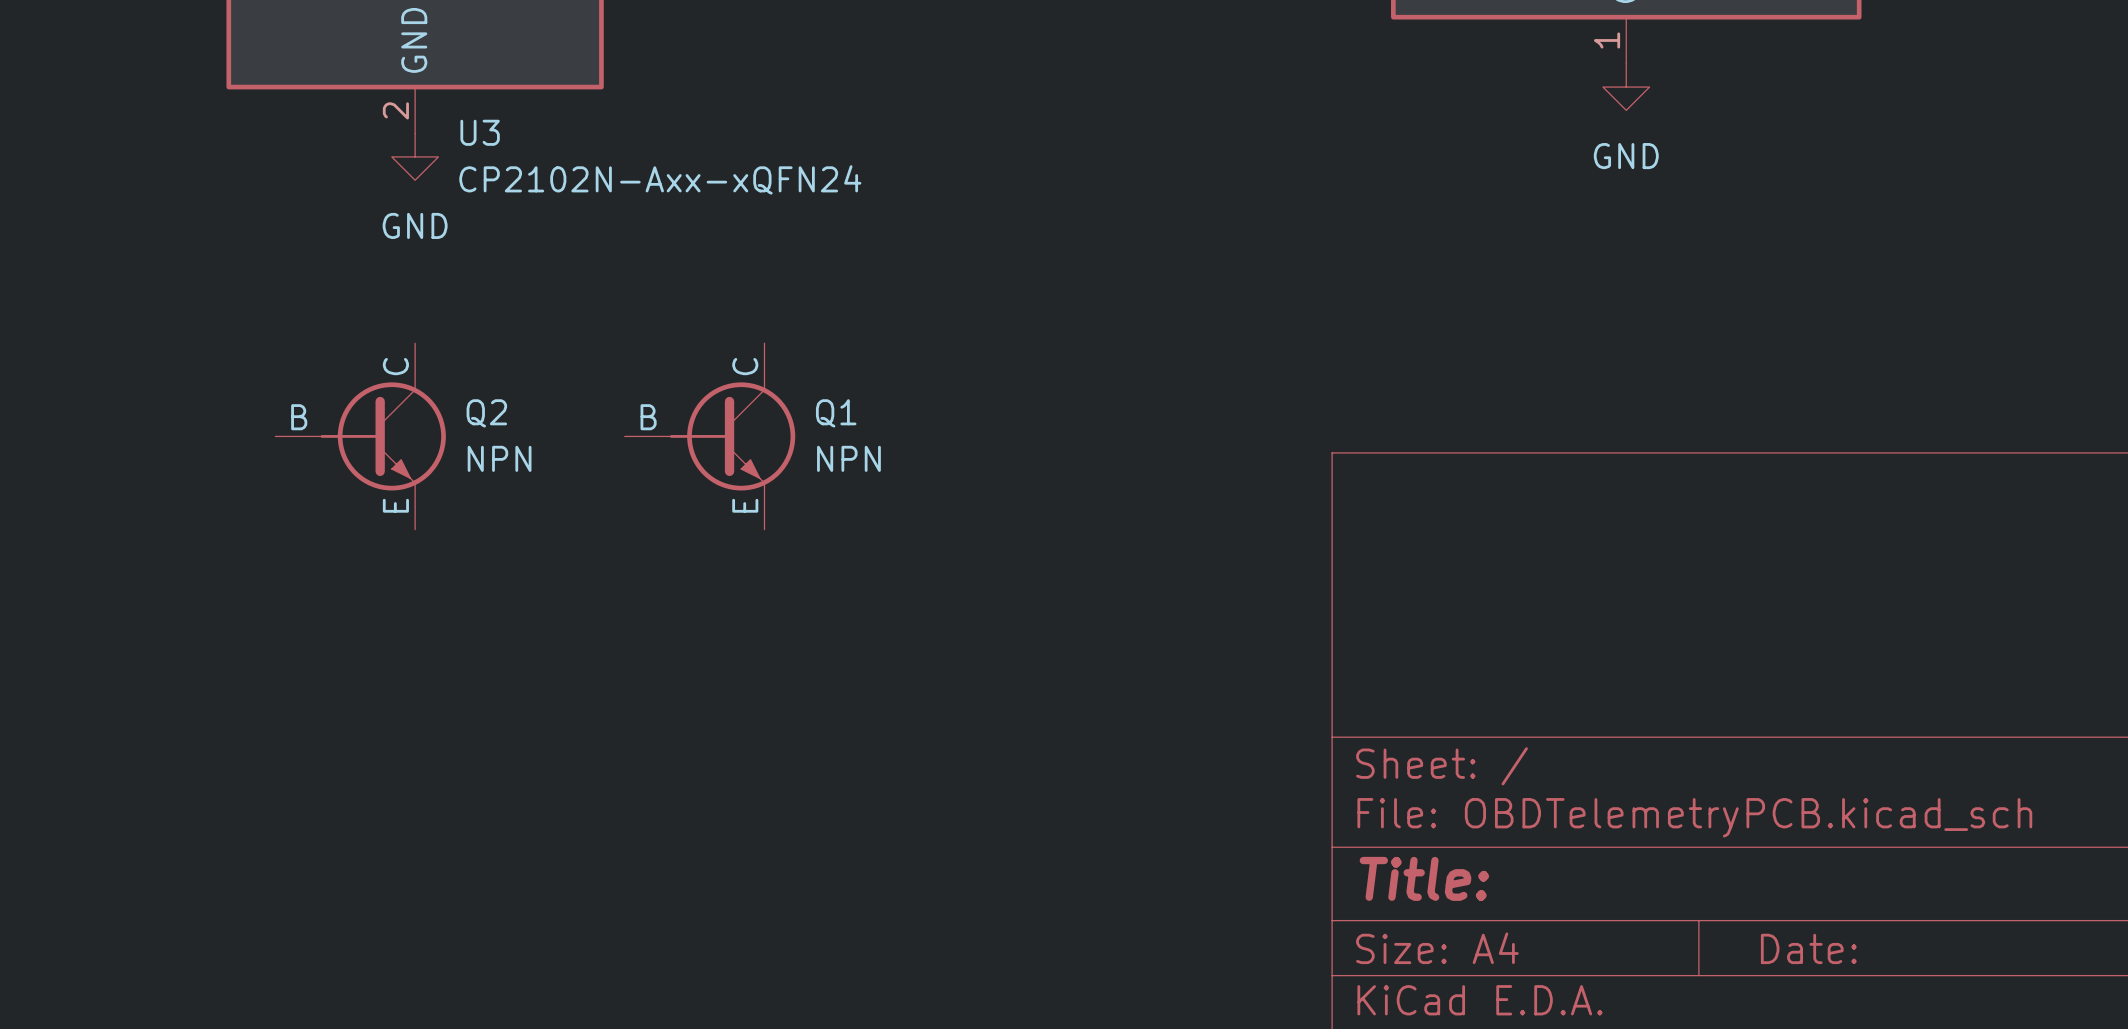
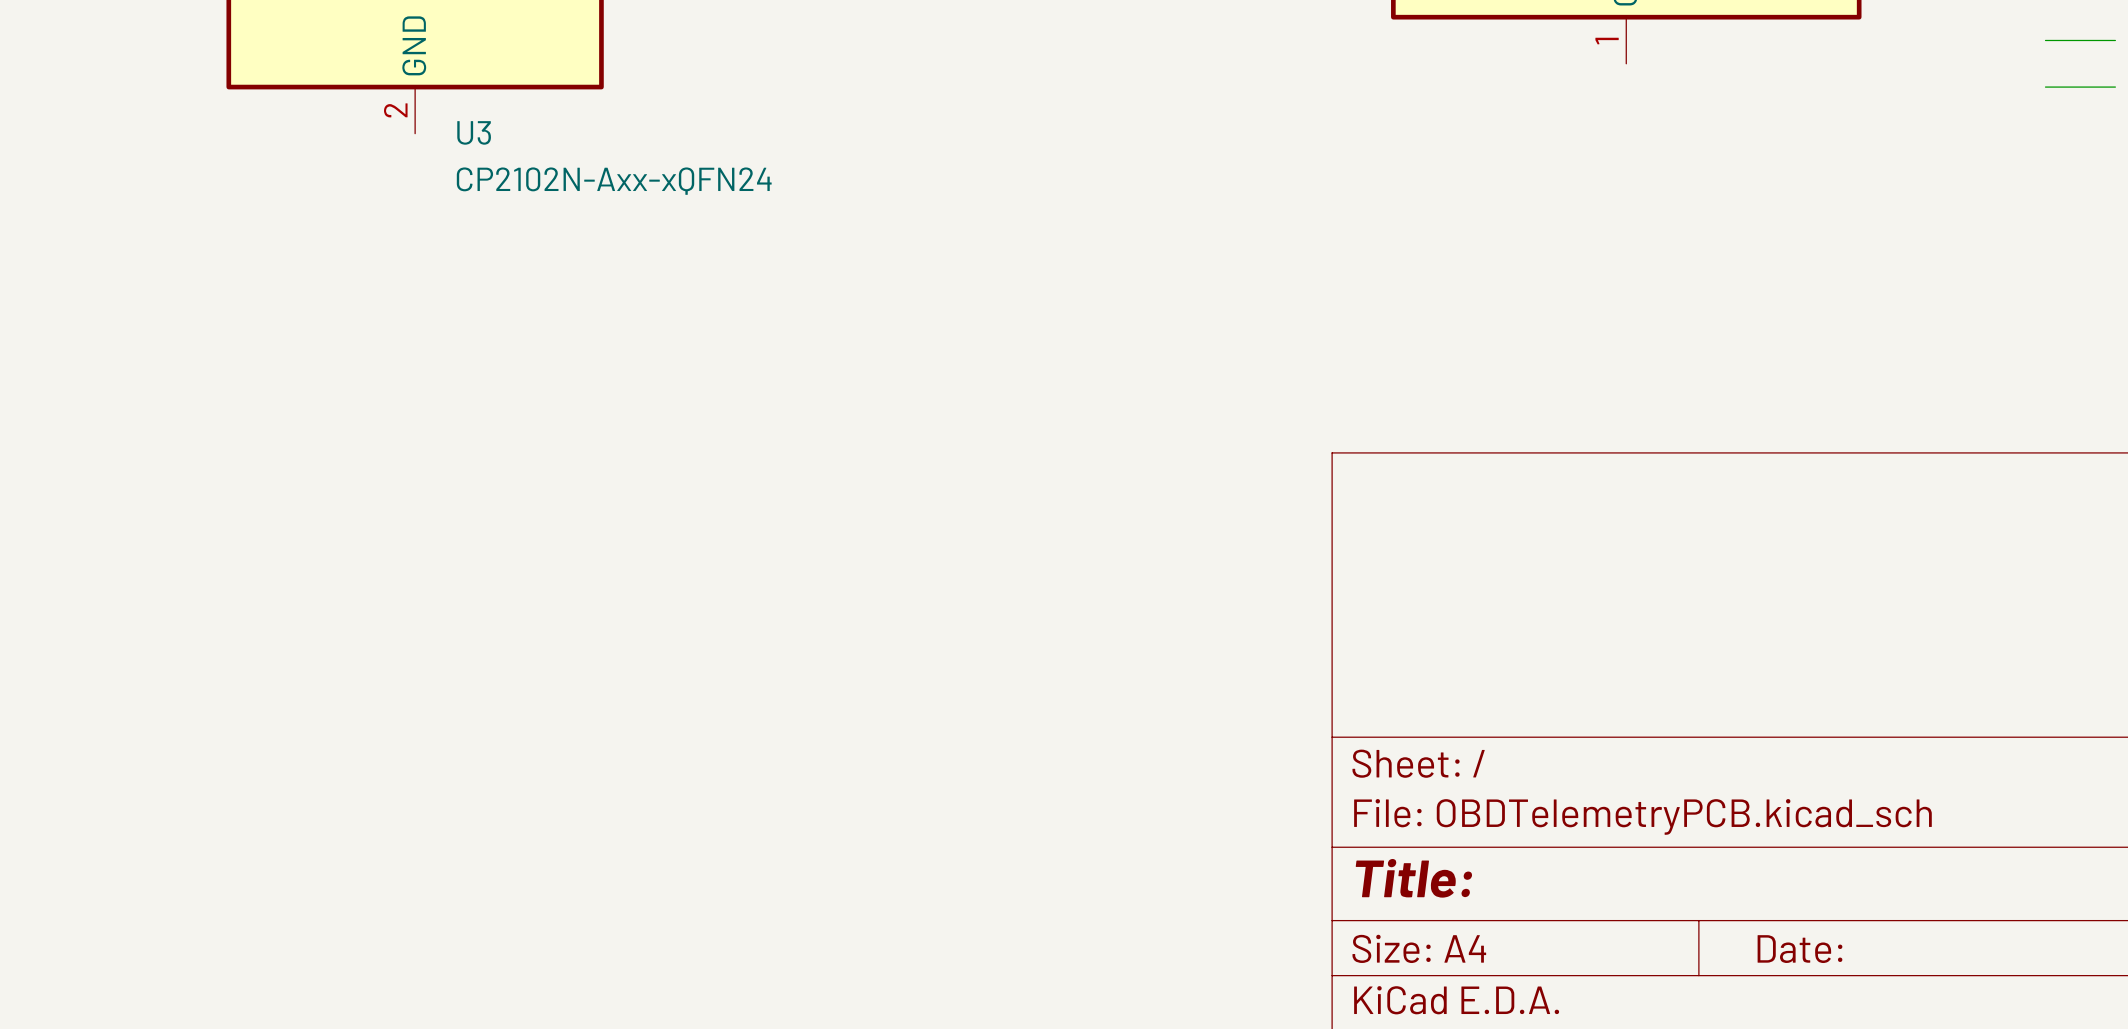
wire: none -> (2045, 40) (2115, 40)
power symbol: GND (1626, 87) -> none
wire: none -> (2045, 87) (2115, 87)
power symbol: GND (415, 156) -> none
Q2: NPN (360, 436) -> none
Q1: NPN (709, 436) -> none

